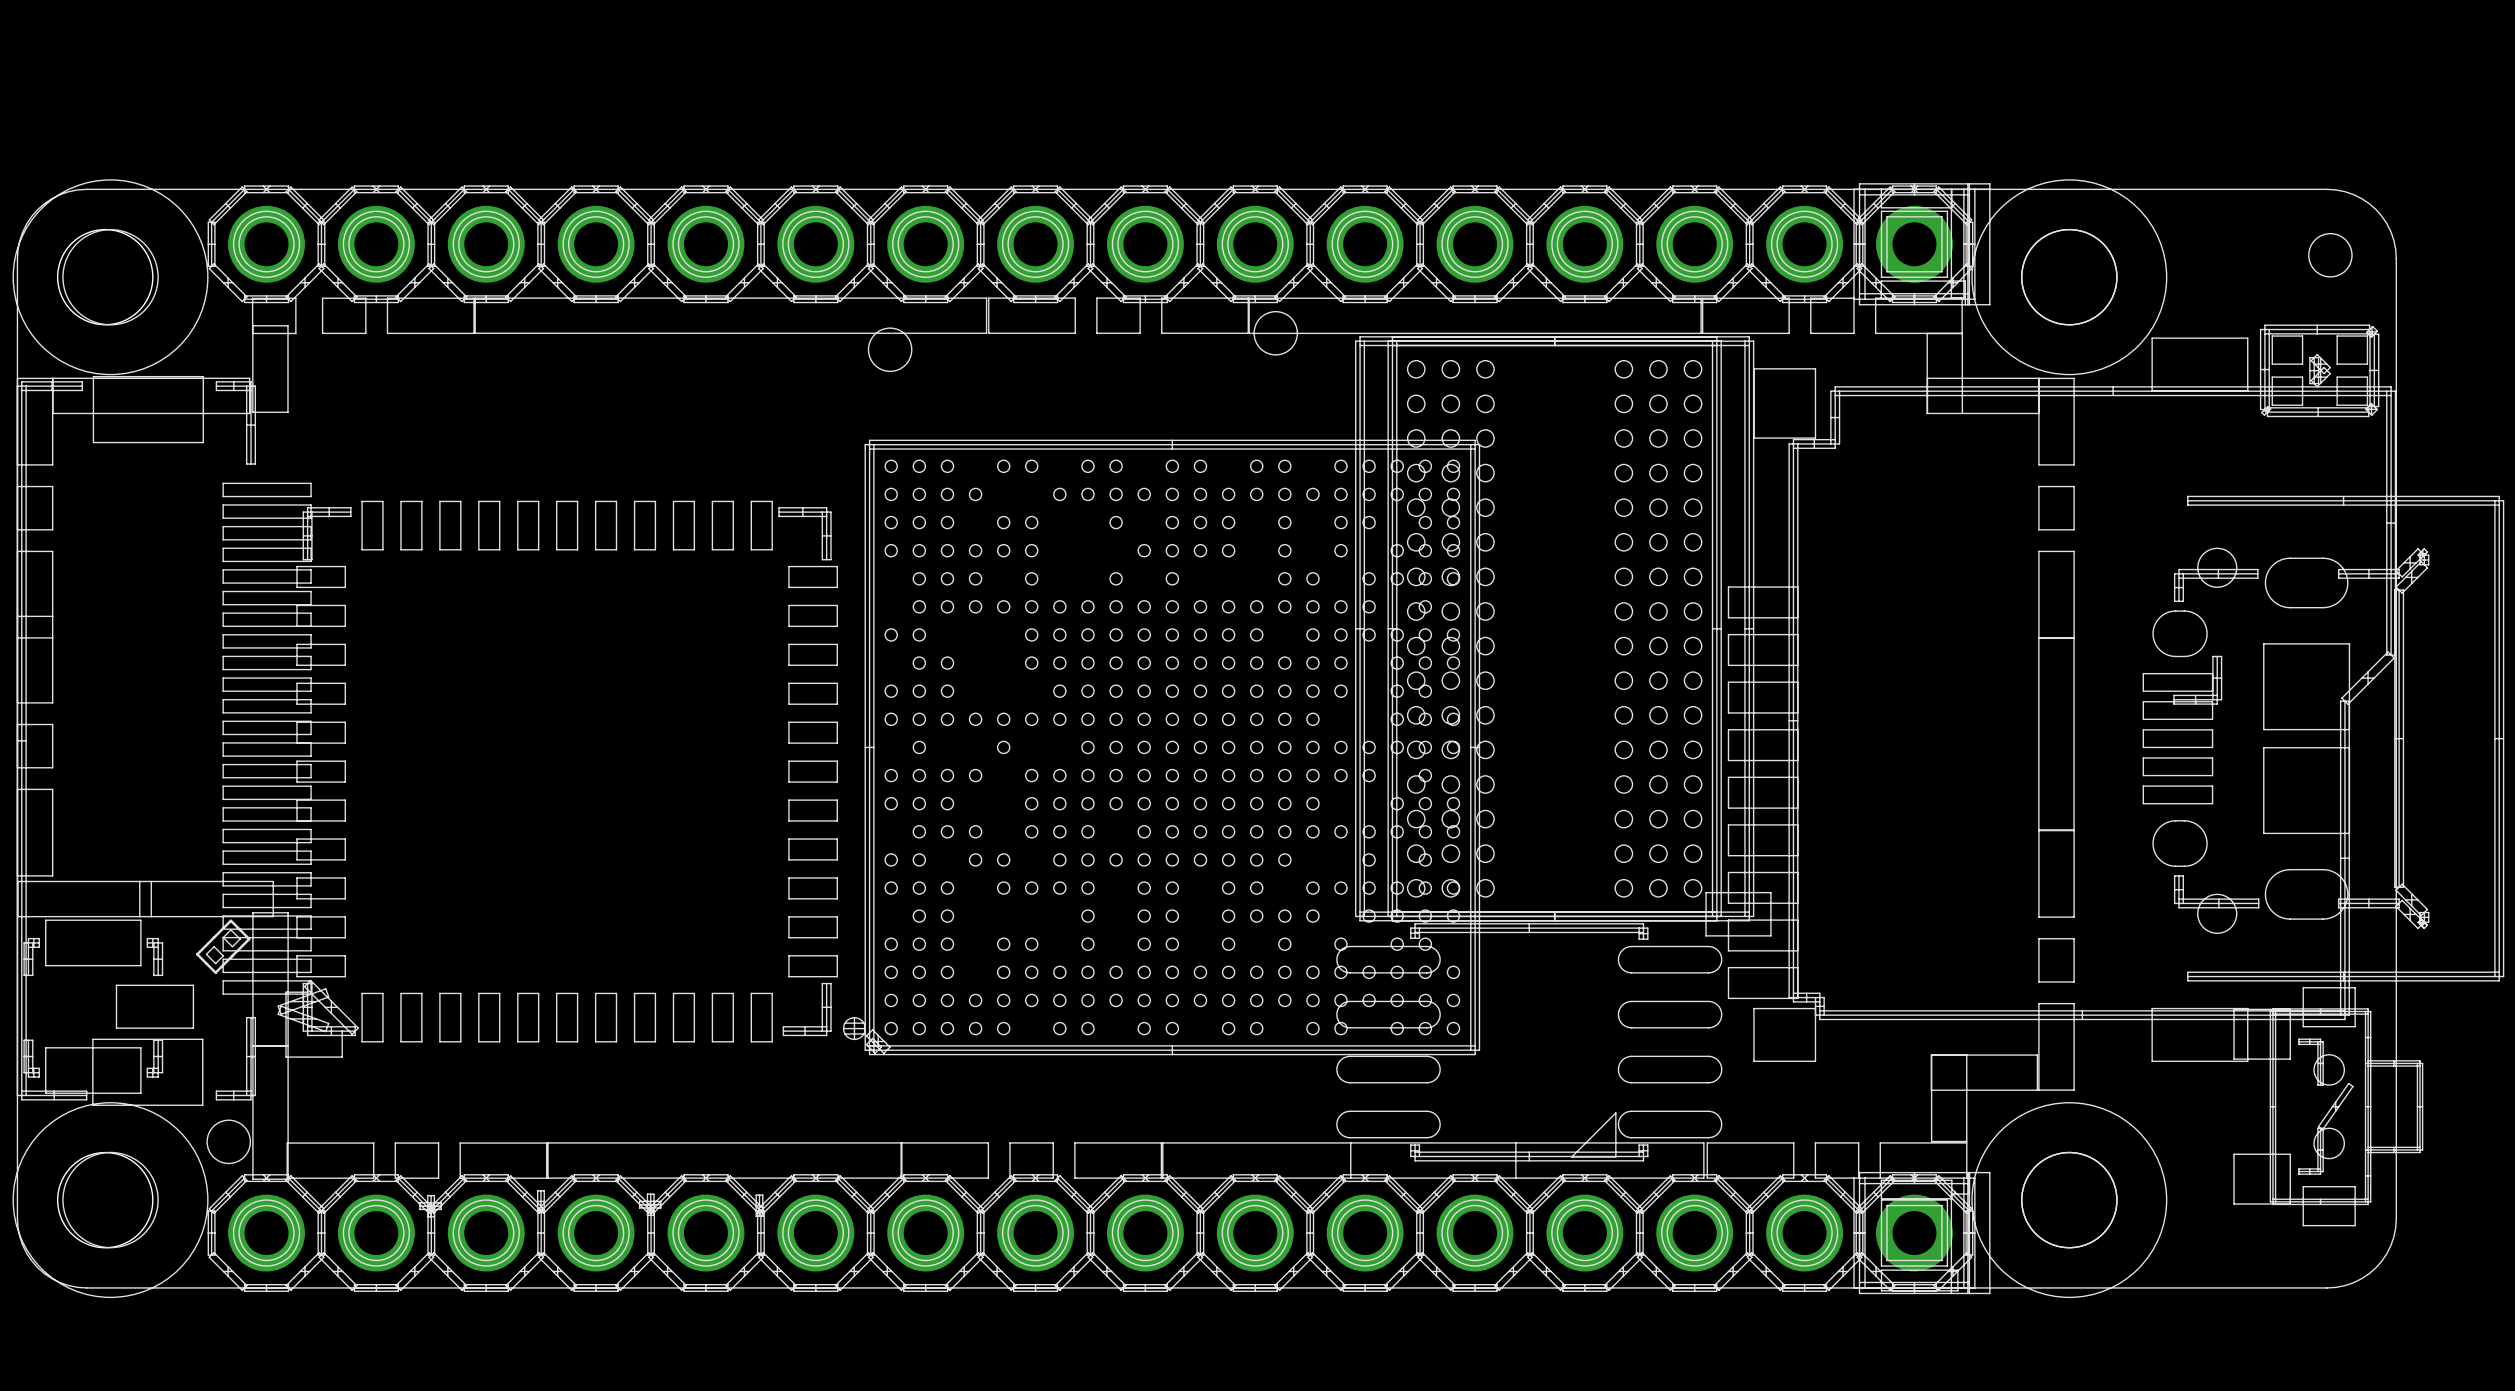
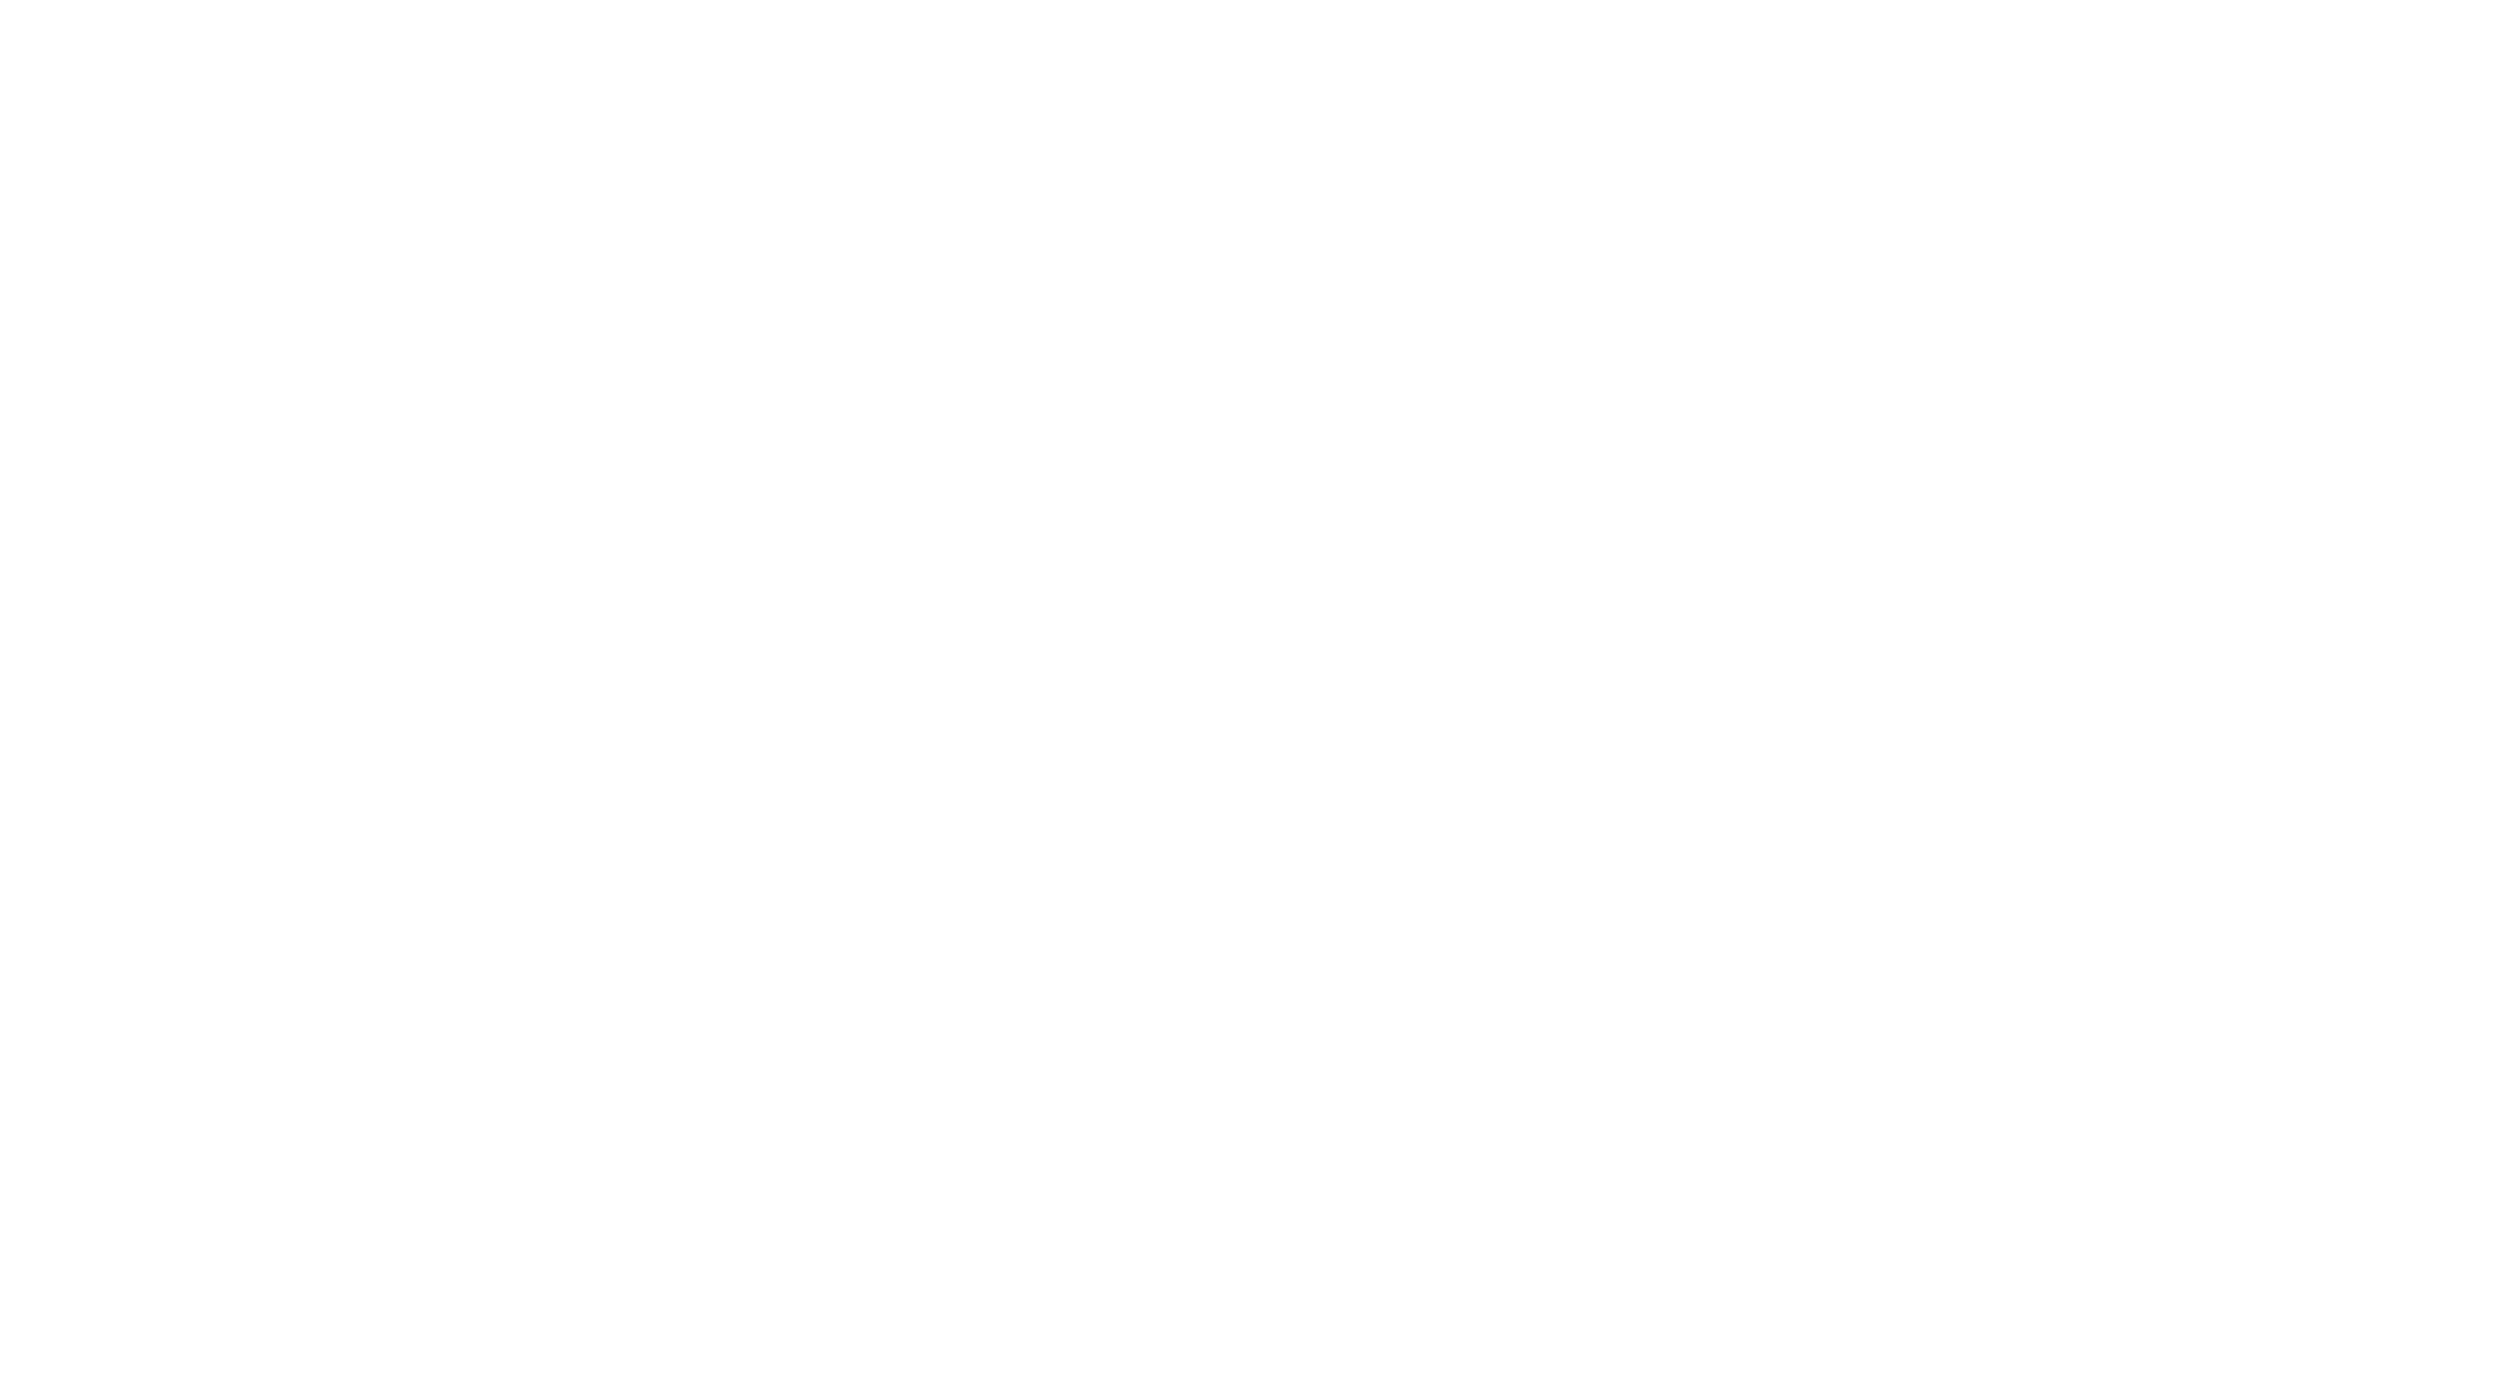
part: (1258, 738) -> none

